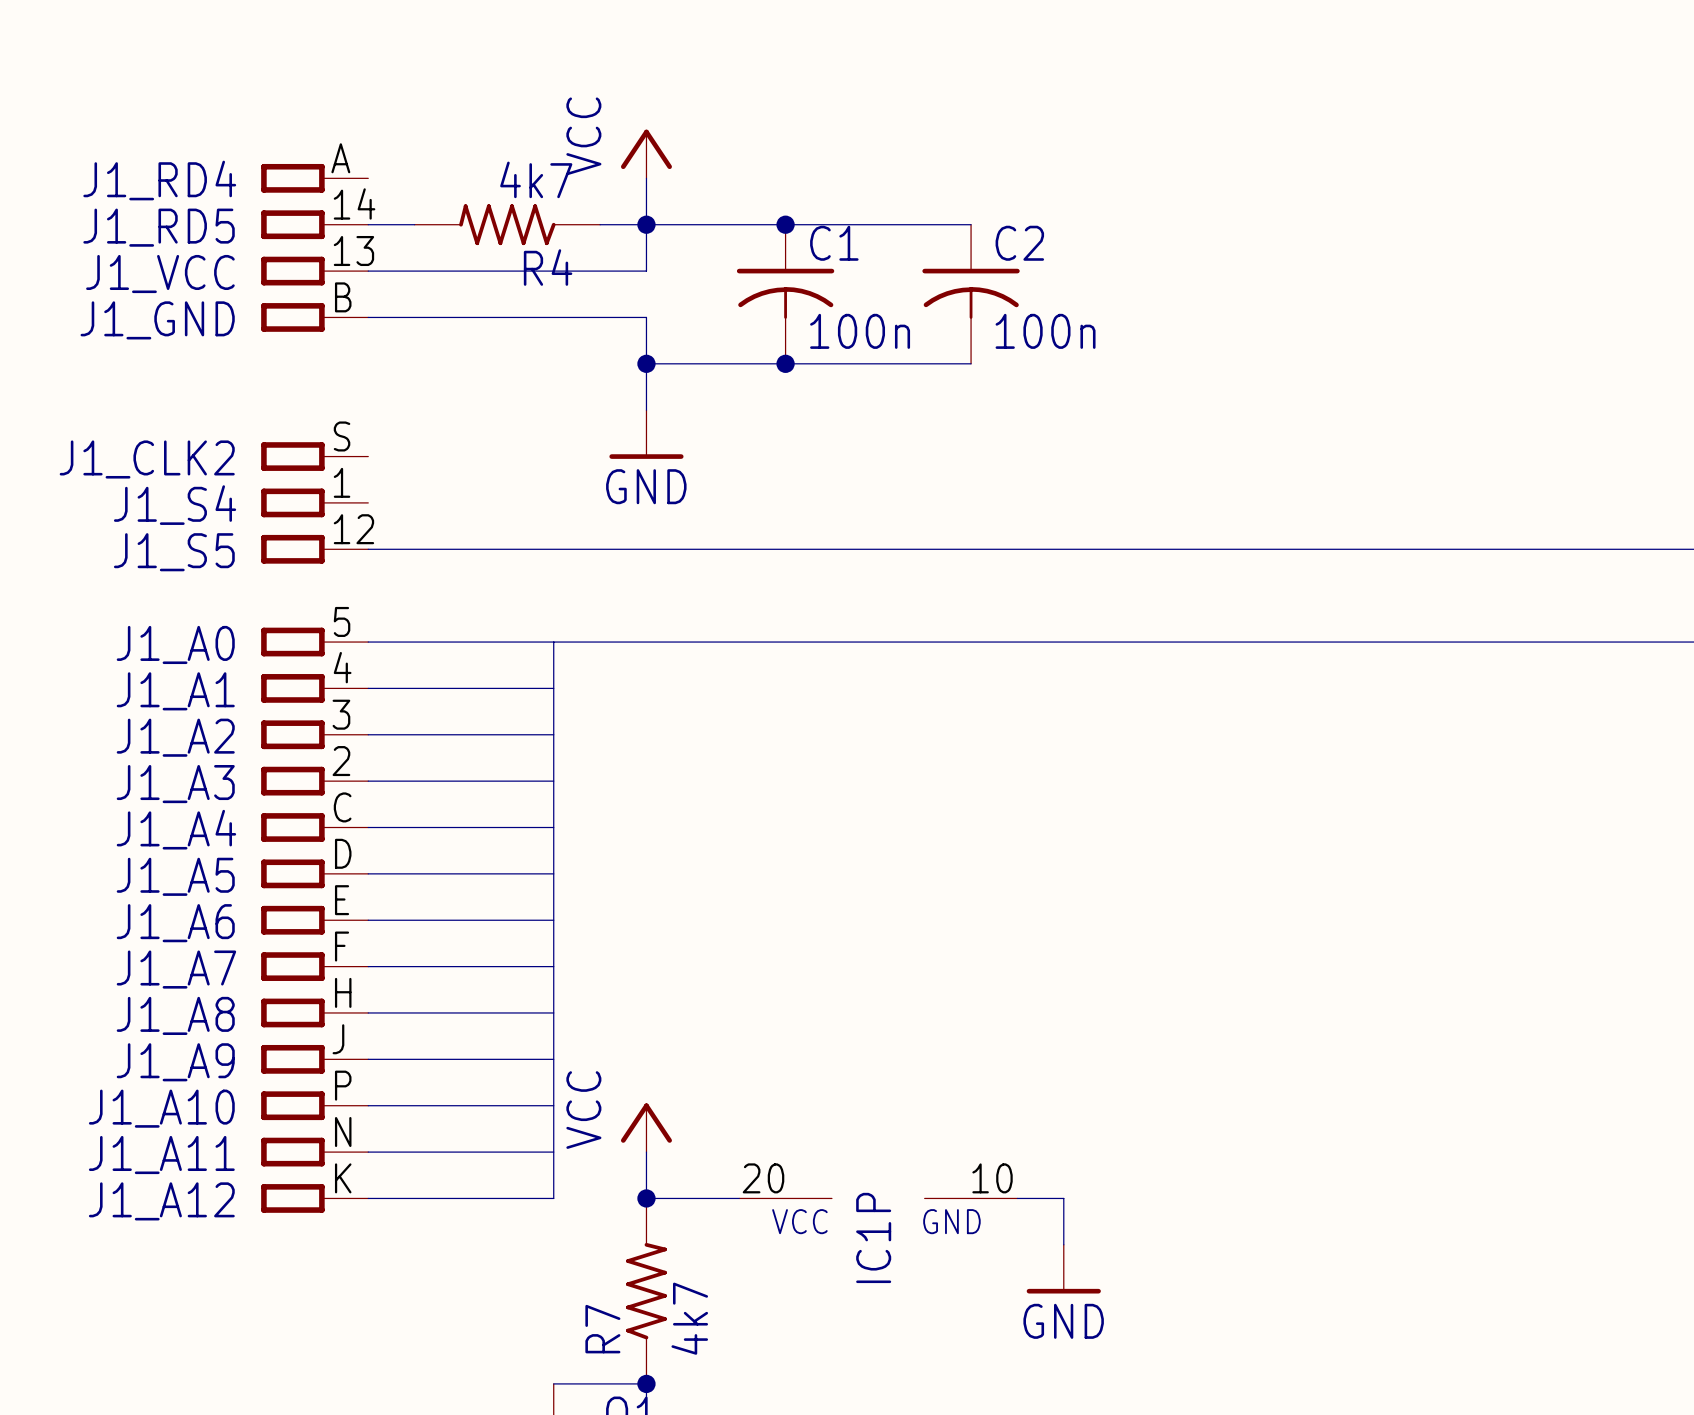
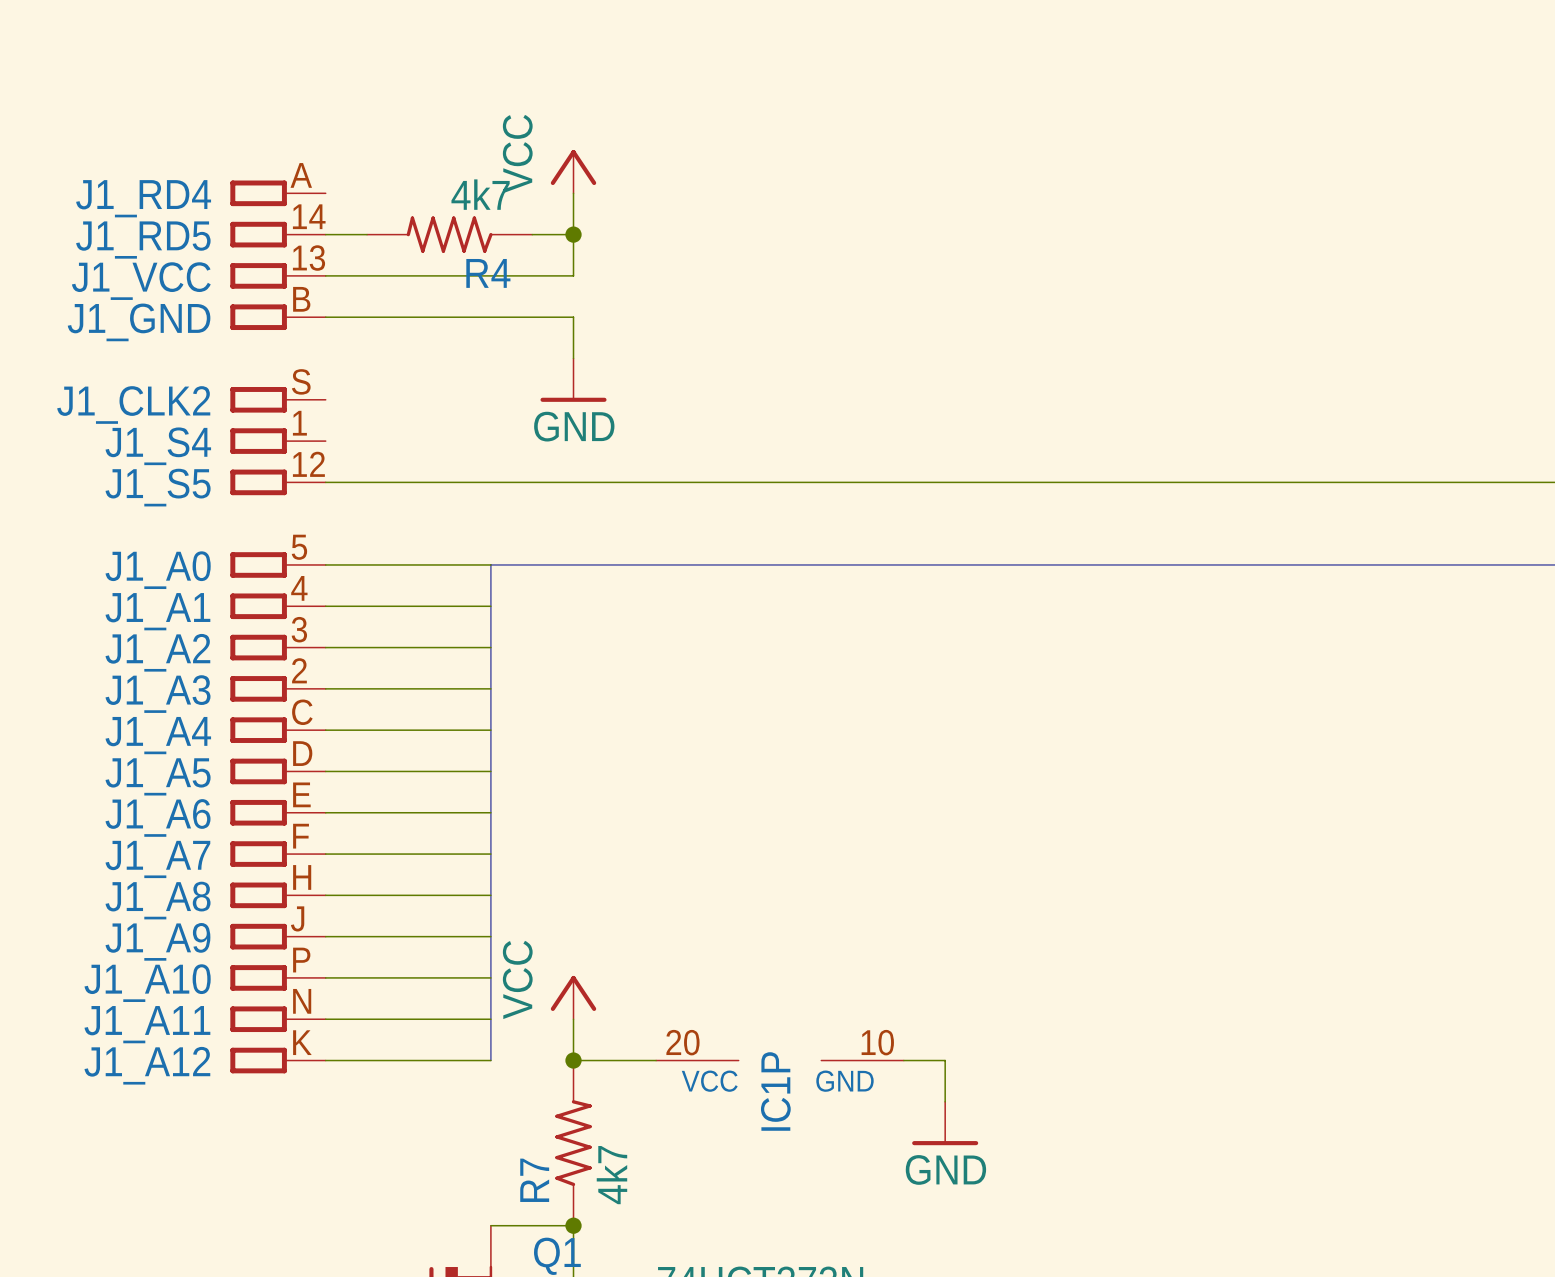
power symbol position: VCC (646, 154) -> VCC (573, 171)
J1_RD4 position: (314, 178) -> (278, 193)
J1_RD5 position: (314, 224) -> (278, 234)
wire: (368, 224) (414, 224) -> none
R4 position: (507, 224) -> (449, 234)
wire: (600, 224) (971, 224) -> none
junction: (646, 224) -> none
junction: (785, 224) -> none
J1_VCC position: (314, 271) -> (278, 275)
junction: none -> (573, 234)
C1: 100n (785, 294) -> none
C2: 100n (971, 294) -> none
J1_GND position: (314, 317) -> (278, 317)
wire: (646, 317) (646, 363) (971, 363) -> (573, 275) (573, 234)
wire: none -> (325, 317) (573, 317)
junction: (646, 363) -> none
junction: (785, 363) -> none

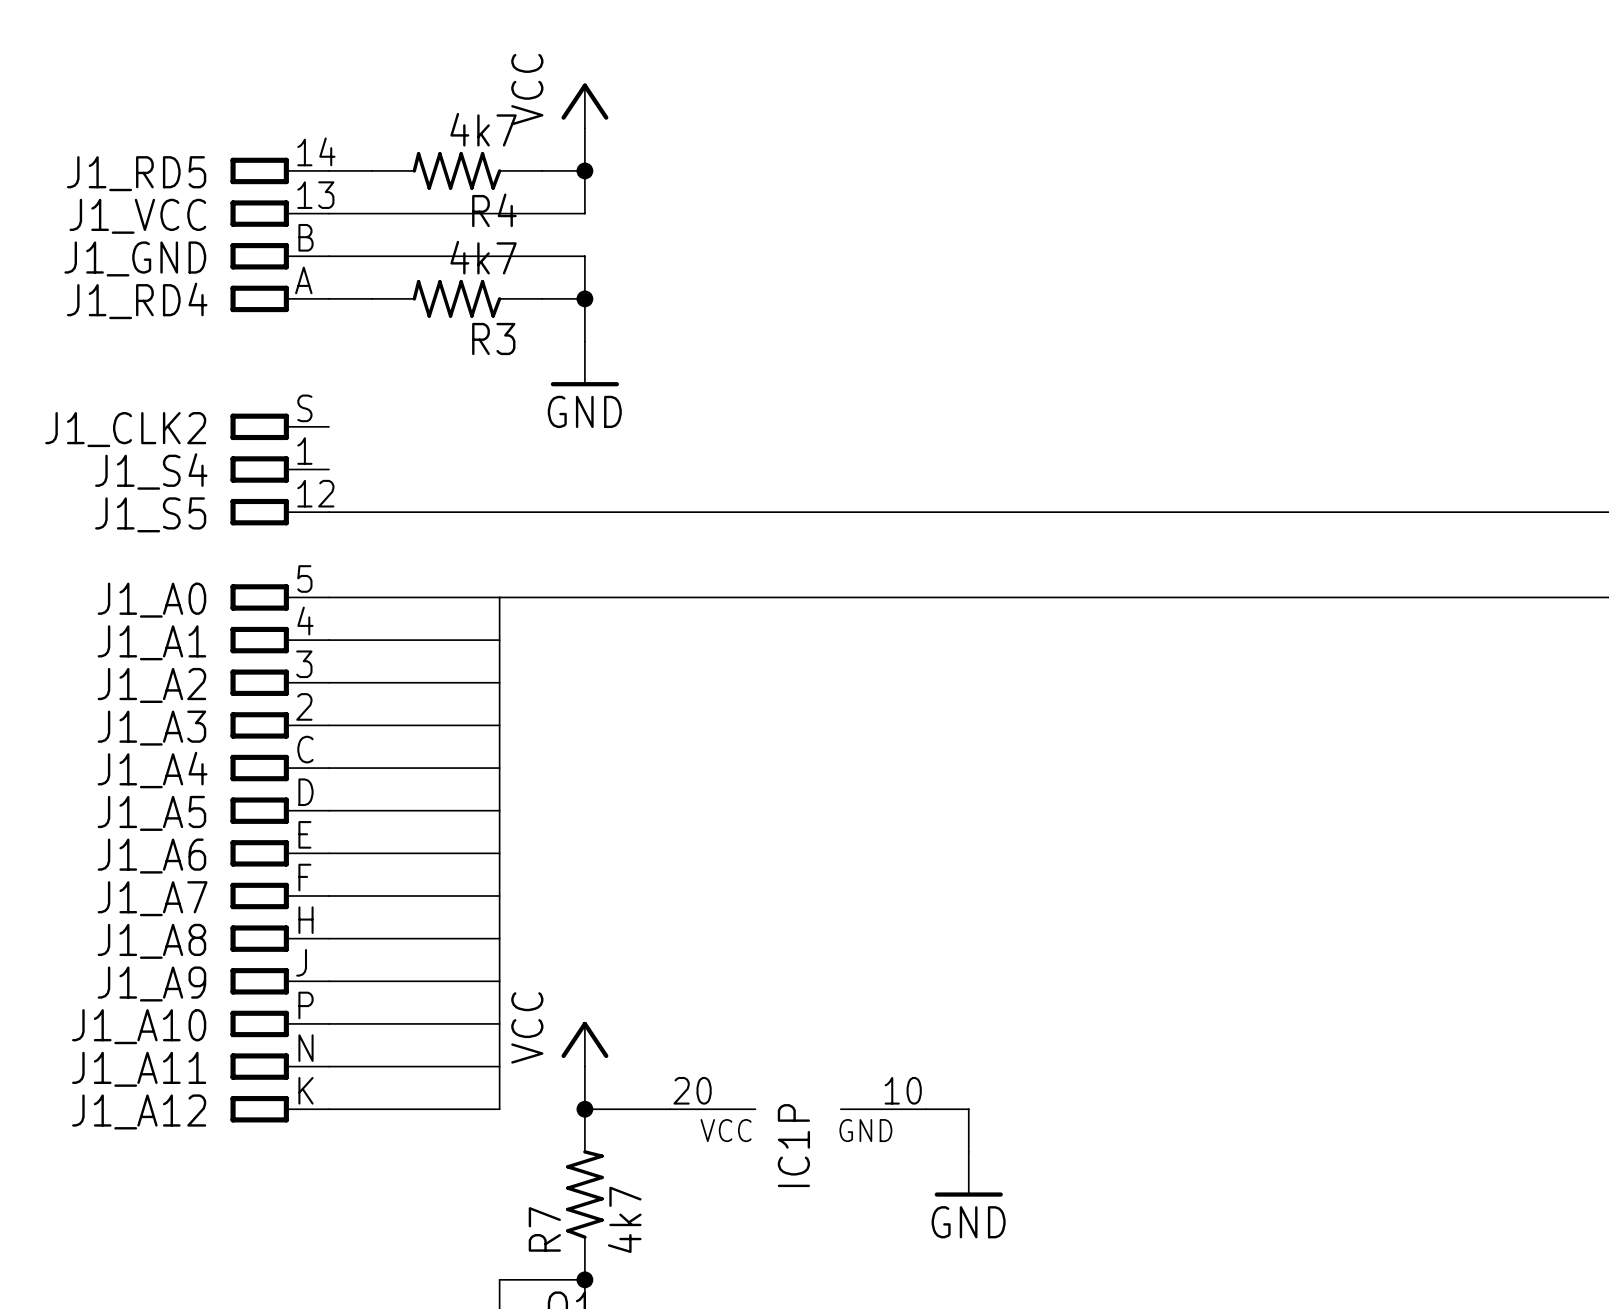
wire: none -> (584, 128) (584, 213) (329, 213)
wire: none -> (329, 170) (371, 170)
wire: none -> (542, 170) (584, 170)
junction: none -> (584, 170)
power symbol position: VCC (573, 171) -> VCC (584, 105)
J1_RD4 position: (278, 193) -> (279, 298)
wire: (573, 193) (573, 234) -> (584, 298) (584, 341)
J1_RD5 position: (278, 234) -> (279, 170)
R4 position: (449, 234) -> (456, 170)
junction: (573, 234) -> none
J1_VCC position: (278, 275) -> (279, 213)
R3: none -> 4k7 (456, 298)
junction: none -> (584, 298)
J1_GND position: (278, 317) -> (279, 256)
wire: (325, 317) (573, 317) (573, 358) -> none
power symbol position: GND (573, 380) -> GND (584, 363)

